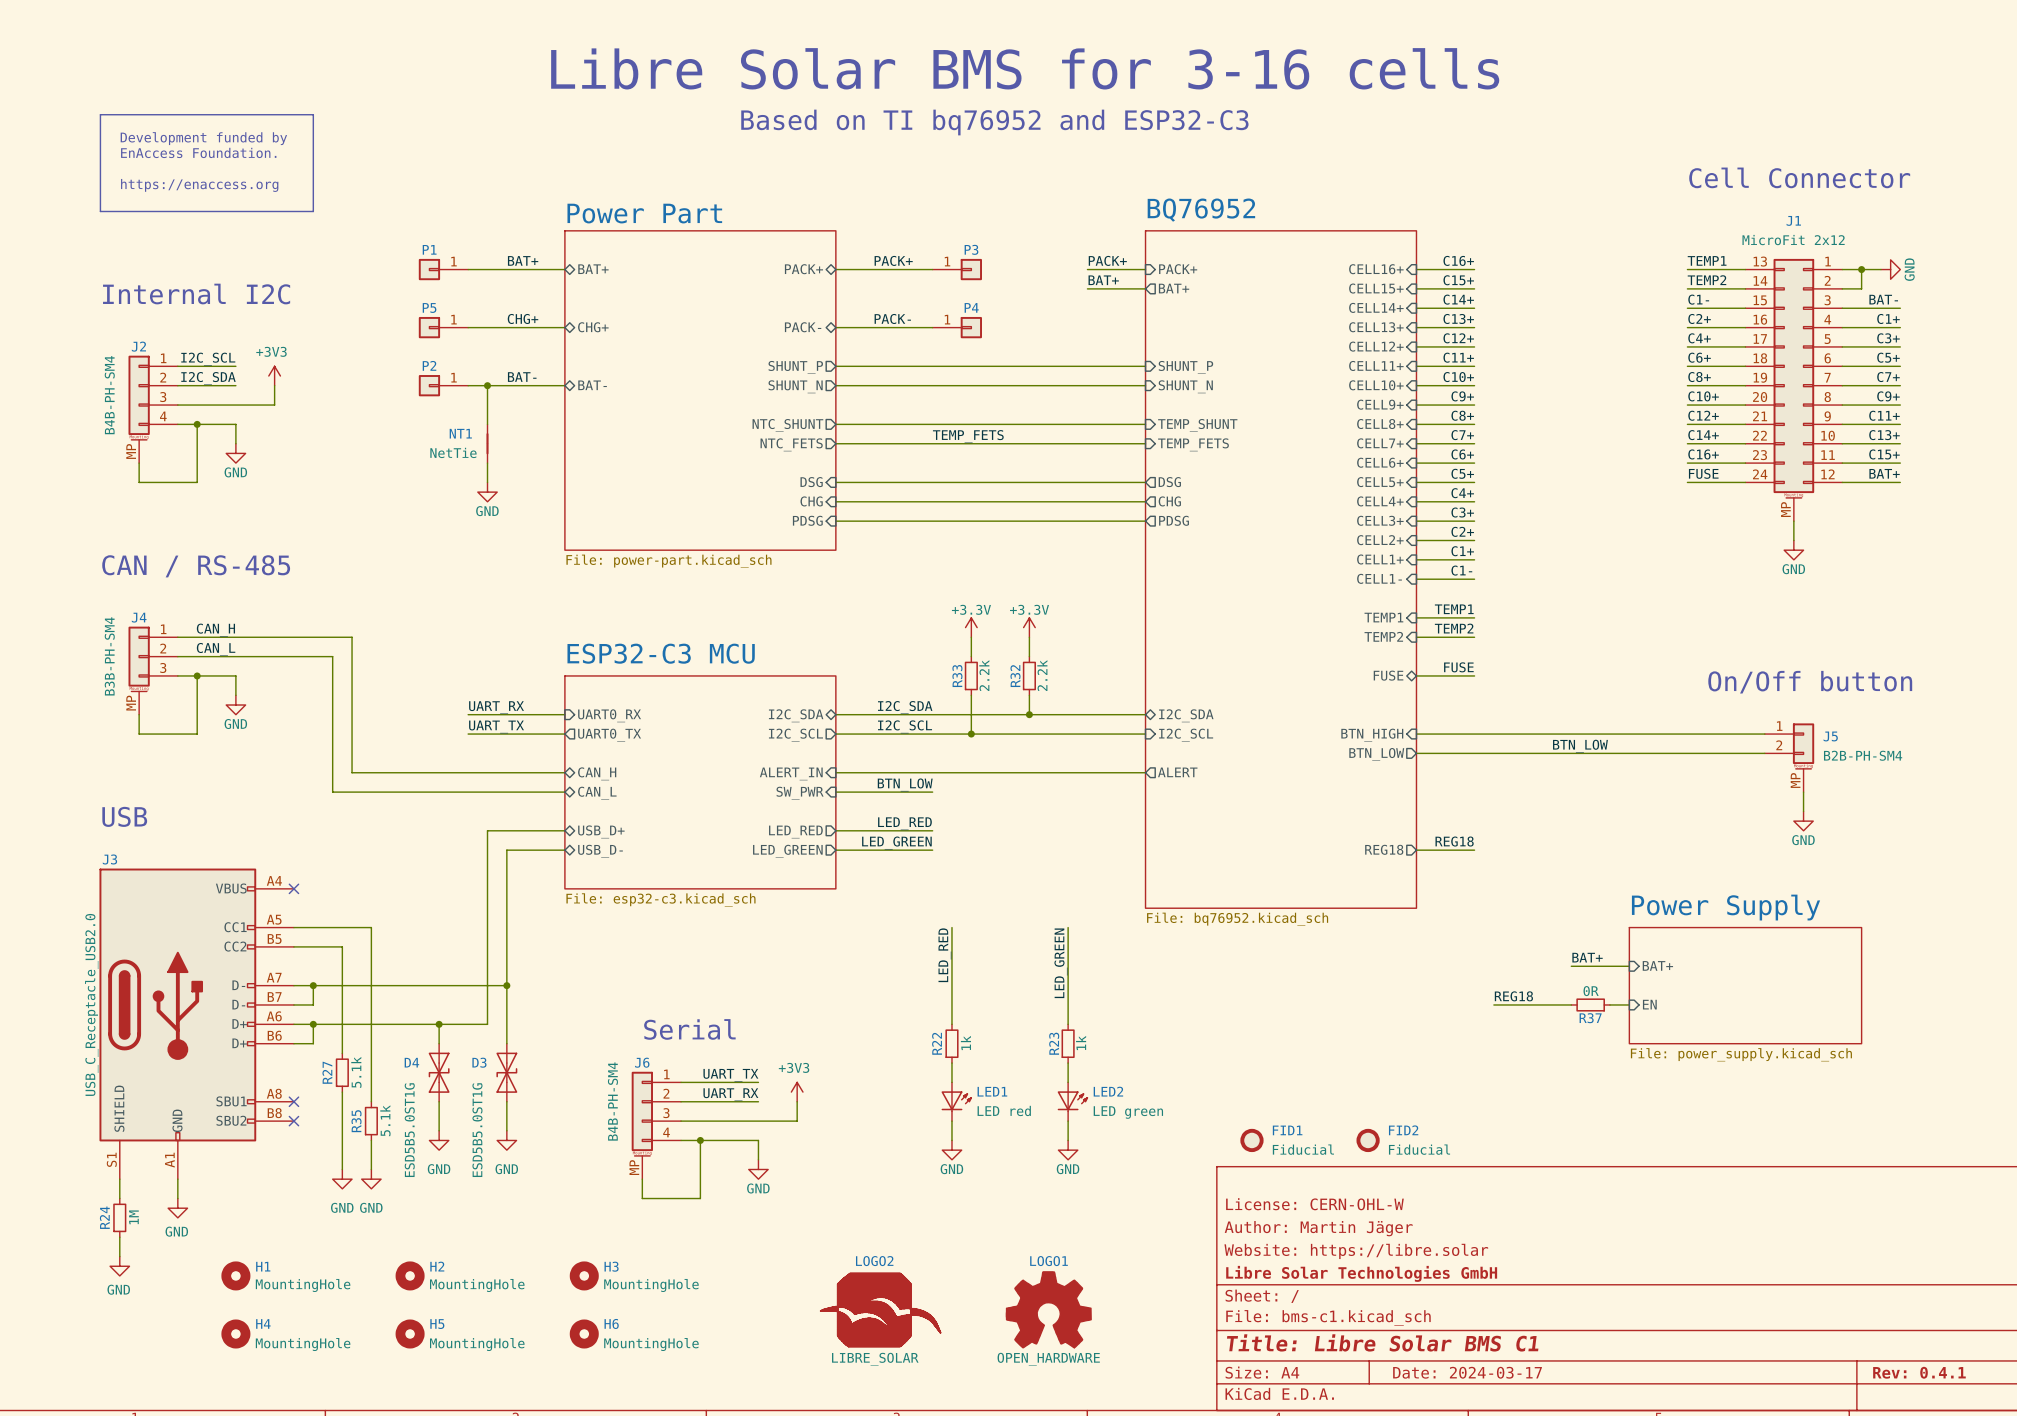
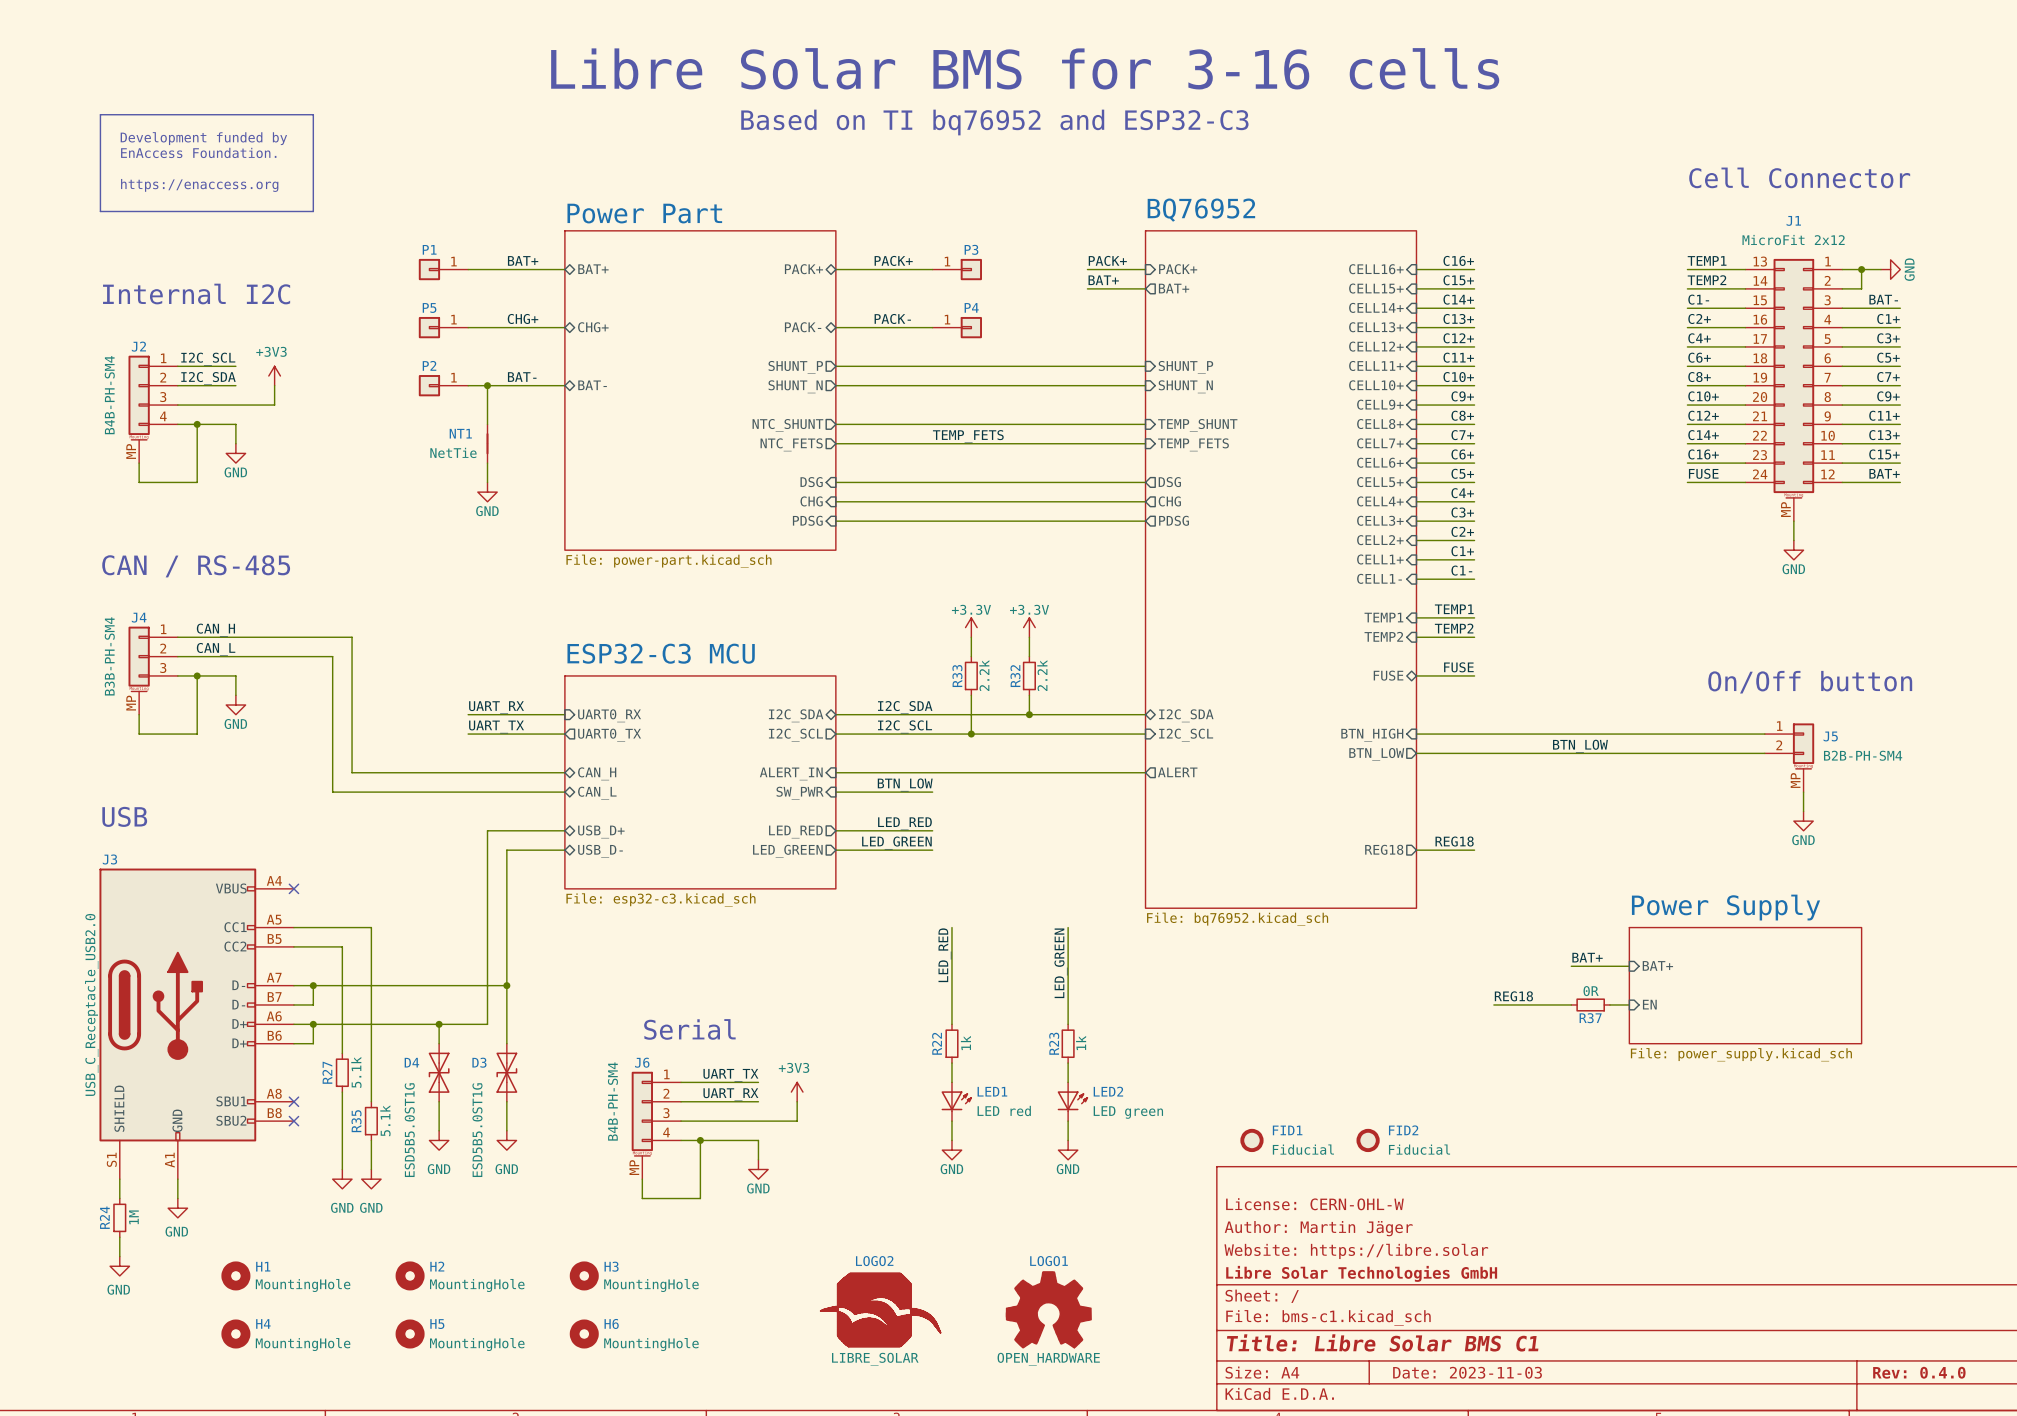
title block: Date: 2024-03-17 (1467, 1372) -> Date: 2023-11-03 (1467, 1372)
title block: Rev: 0.4.1 (1919, 1372) -> Rev: 0.4.0 (1919, 1372)

